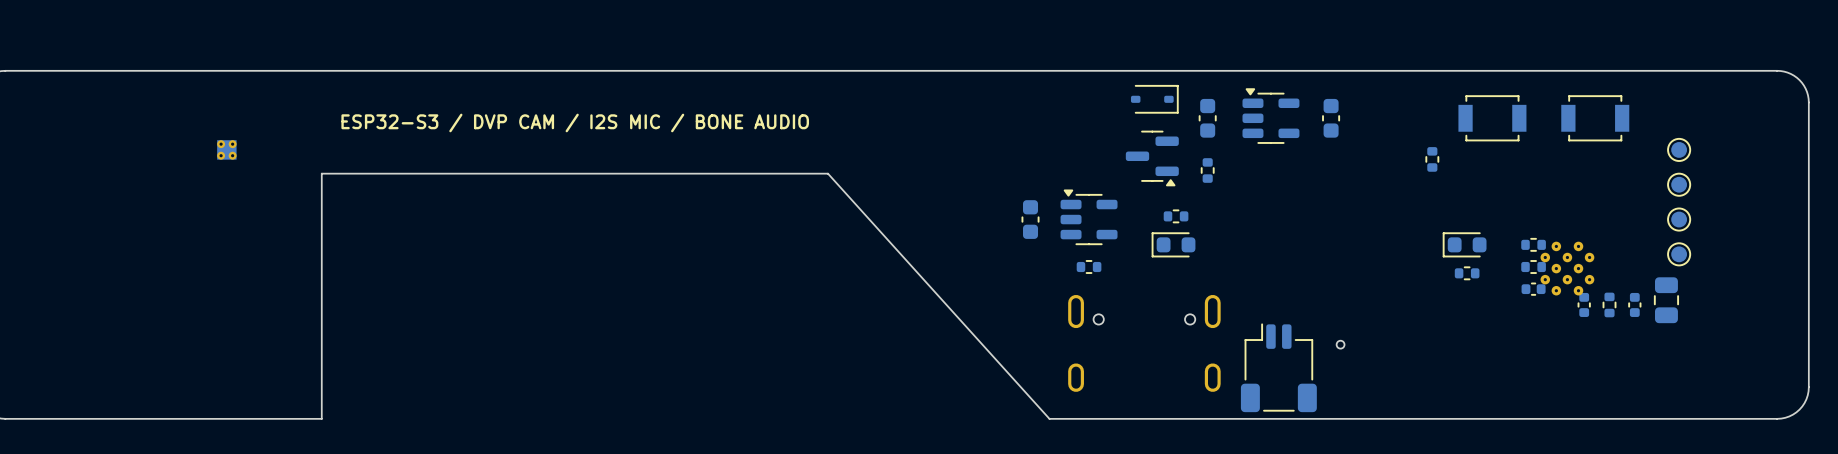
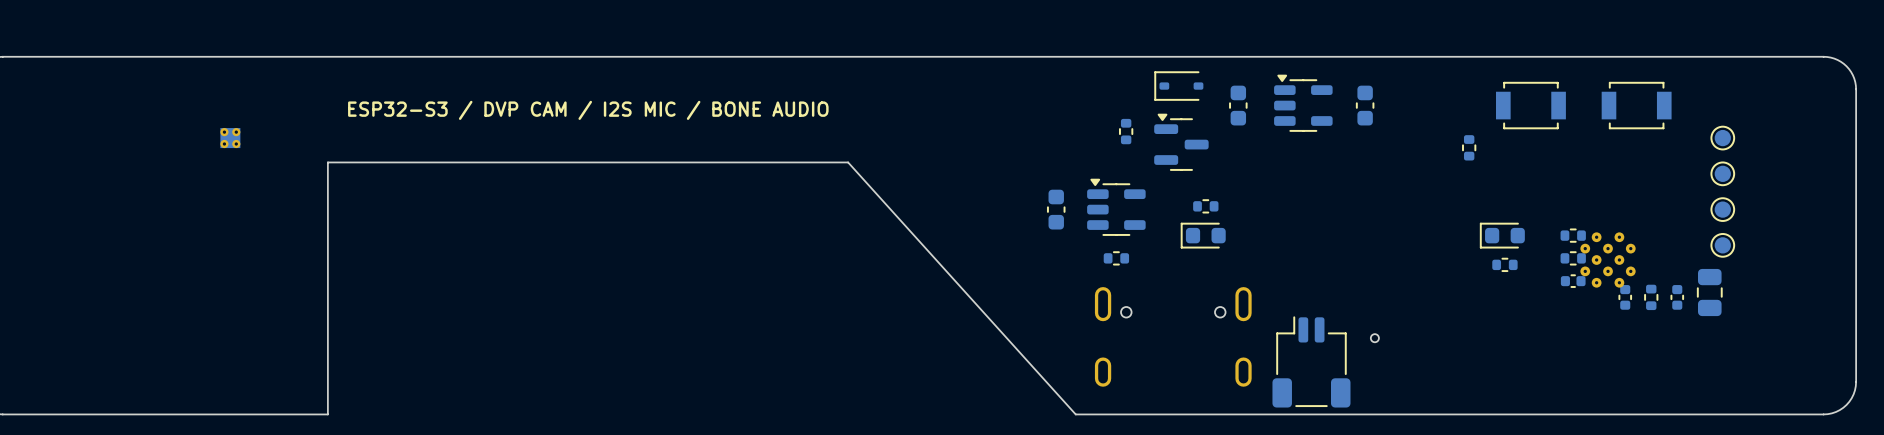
part rotation: 0° (1154, 99) -> 180° (1178, 86)
part rotation: 0° (1152, 158) -> 180° (1181, 142)
part position: (1207, 170) -> (1126, 131)

